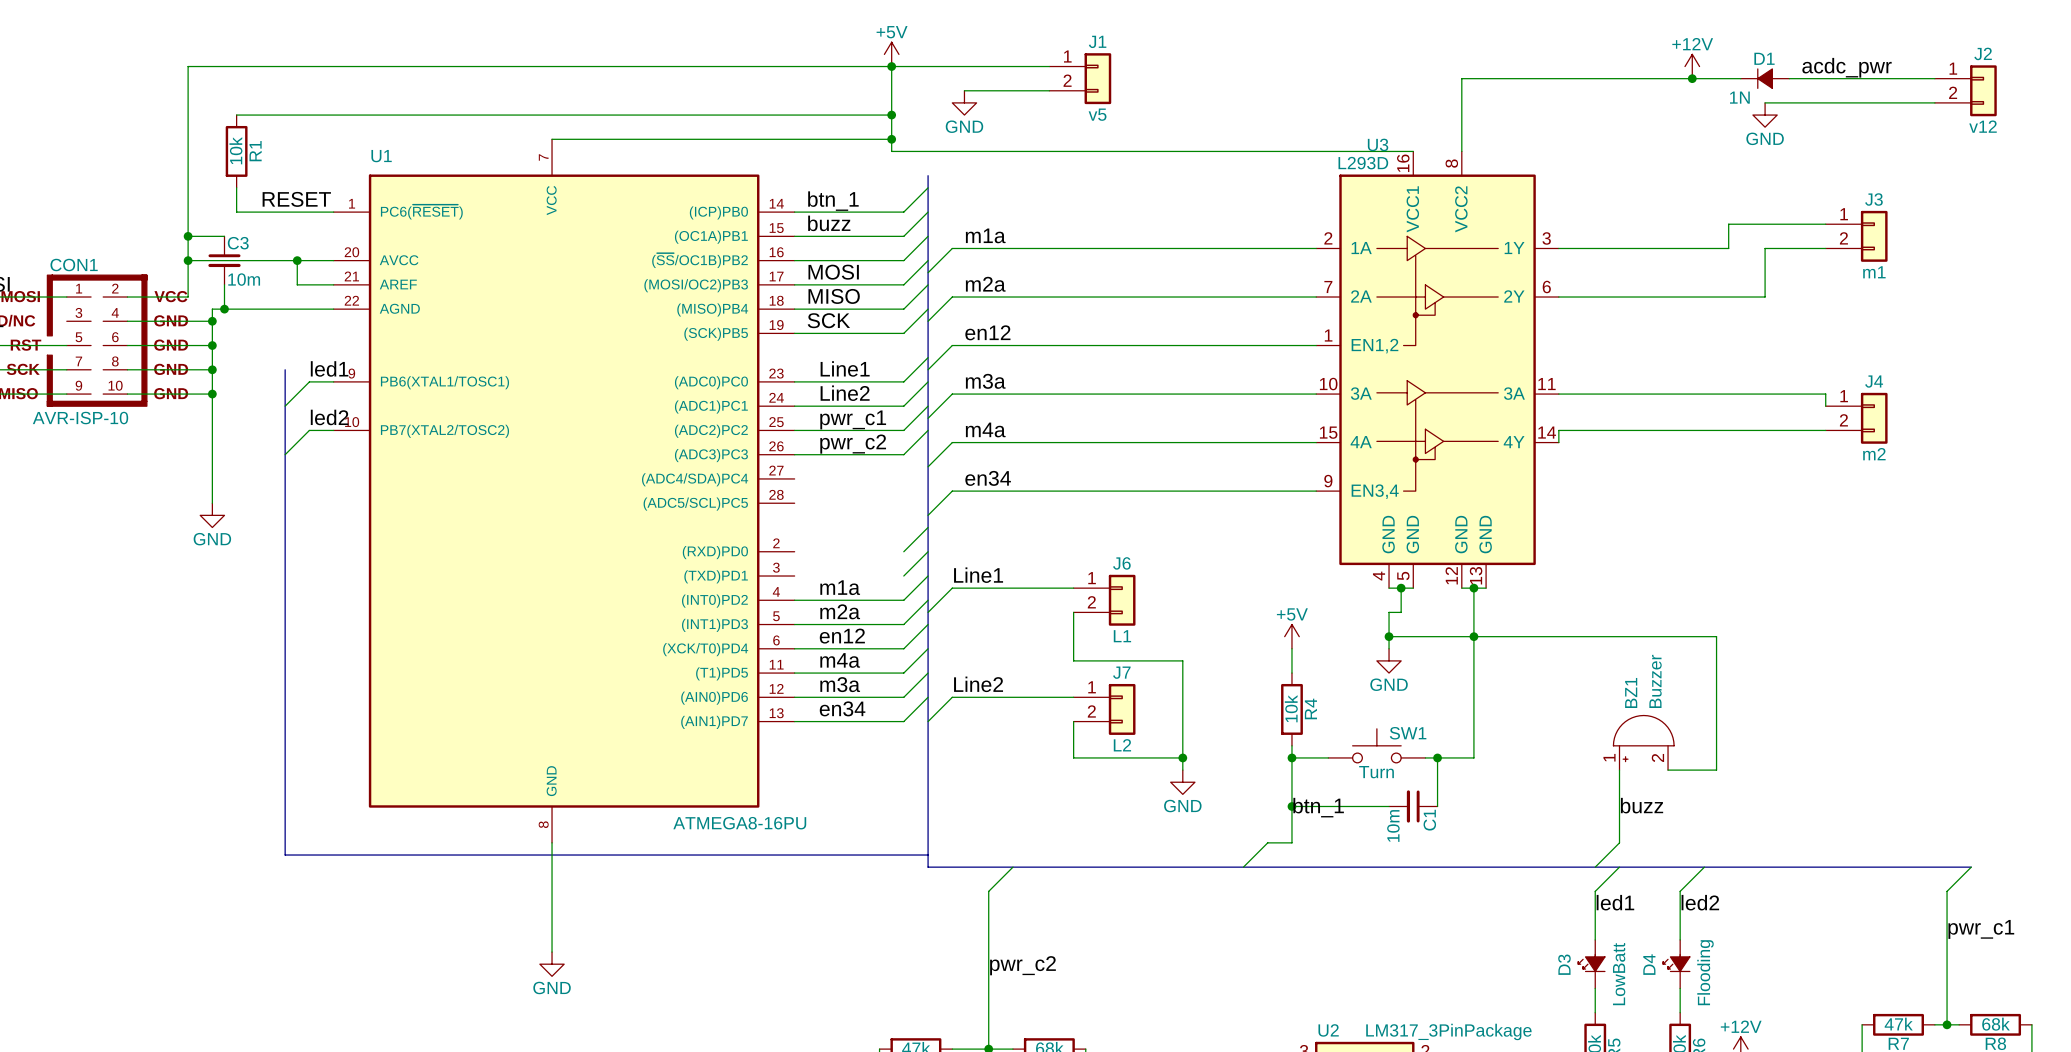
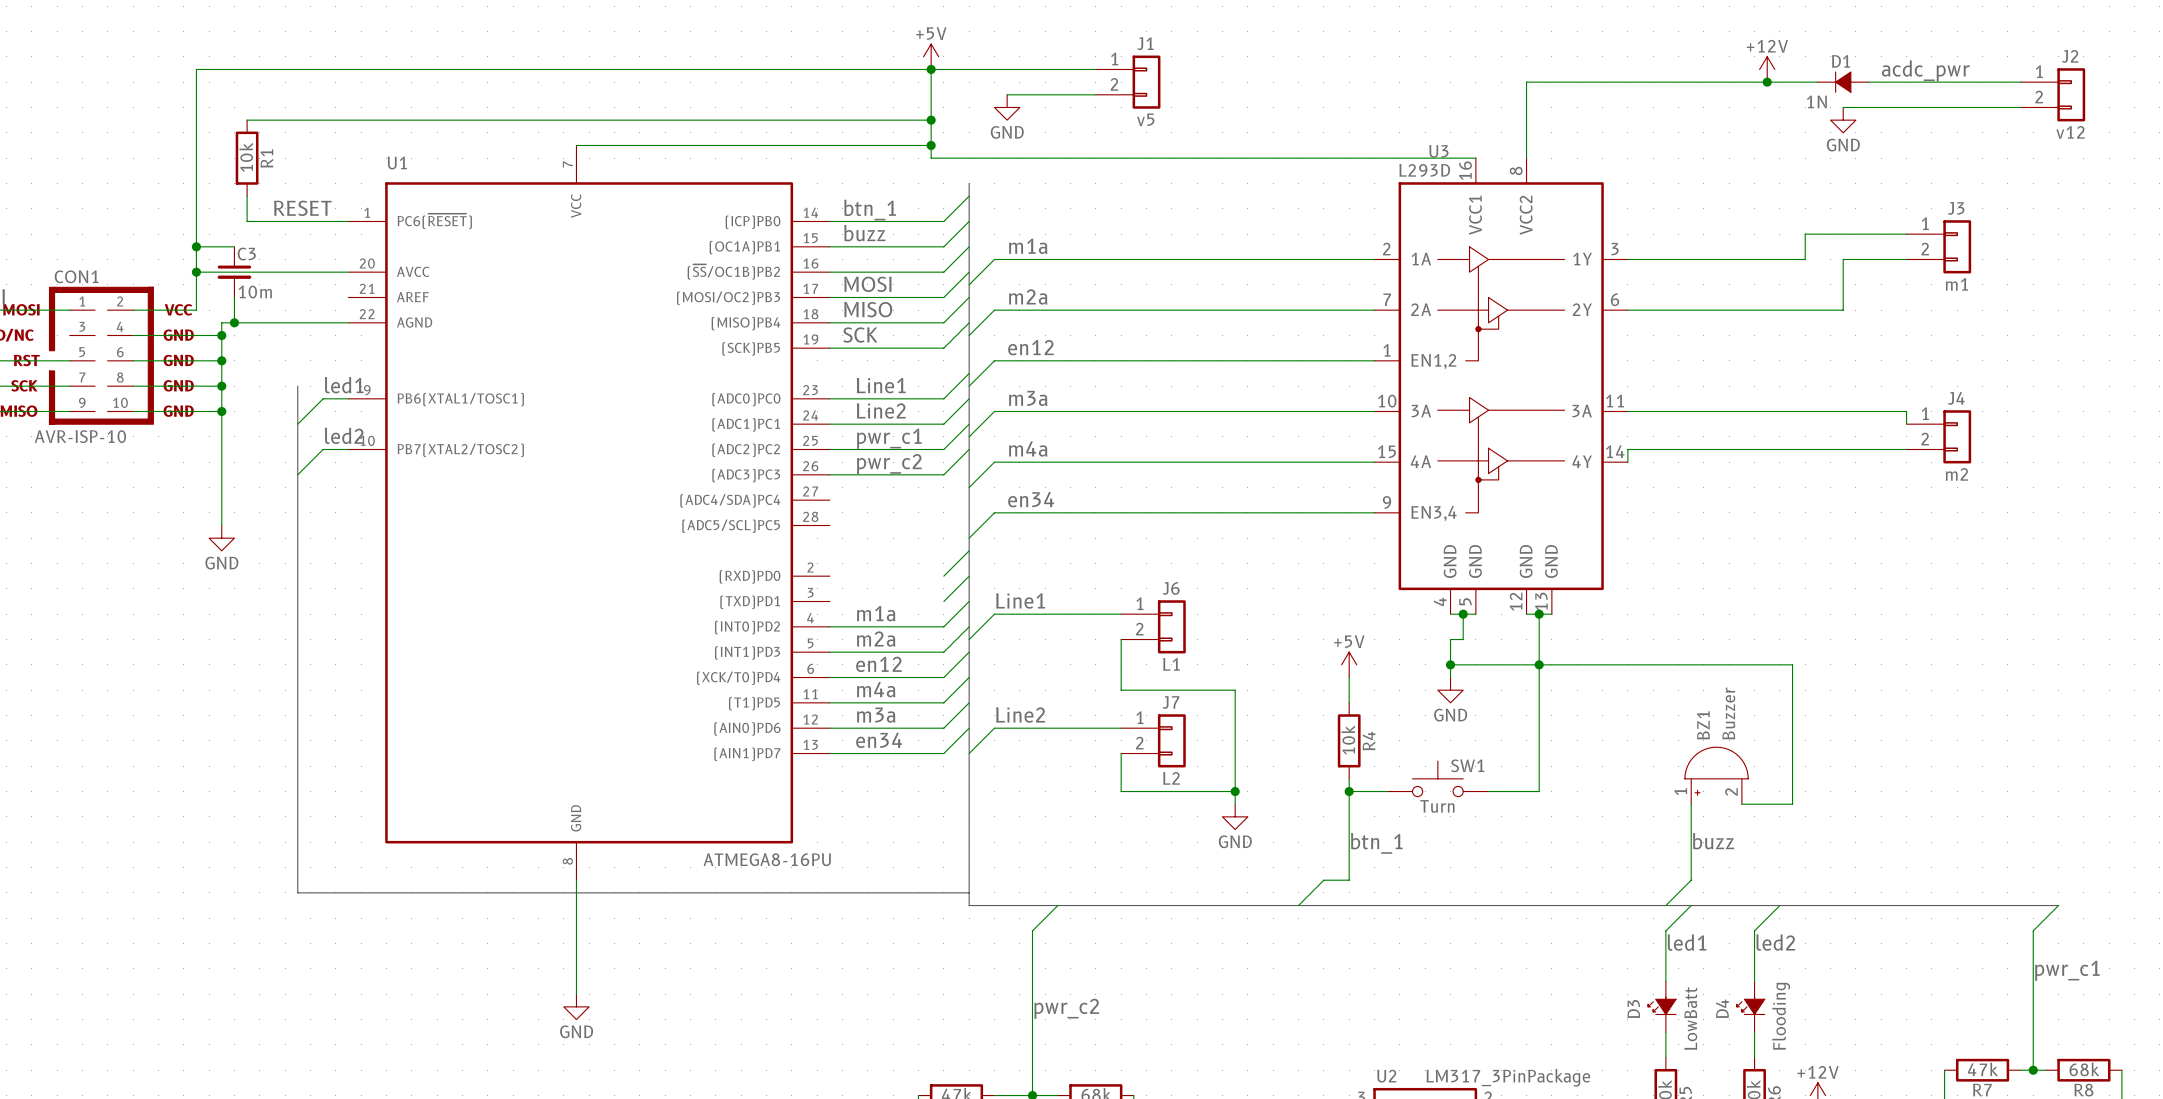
wire: (297, 260) (297, 284) (333, 284) -> none
junction: (297, 260) -> none
wire: (1437, 757) (1437, 806) -> none
junction: (1437, 757) -> none
wire: (1291, 806) (1389, 806) -> none
junction: (1291, 806) -> none
C1: 10m (1413, 806) -> none

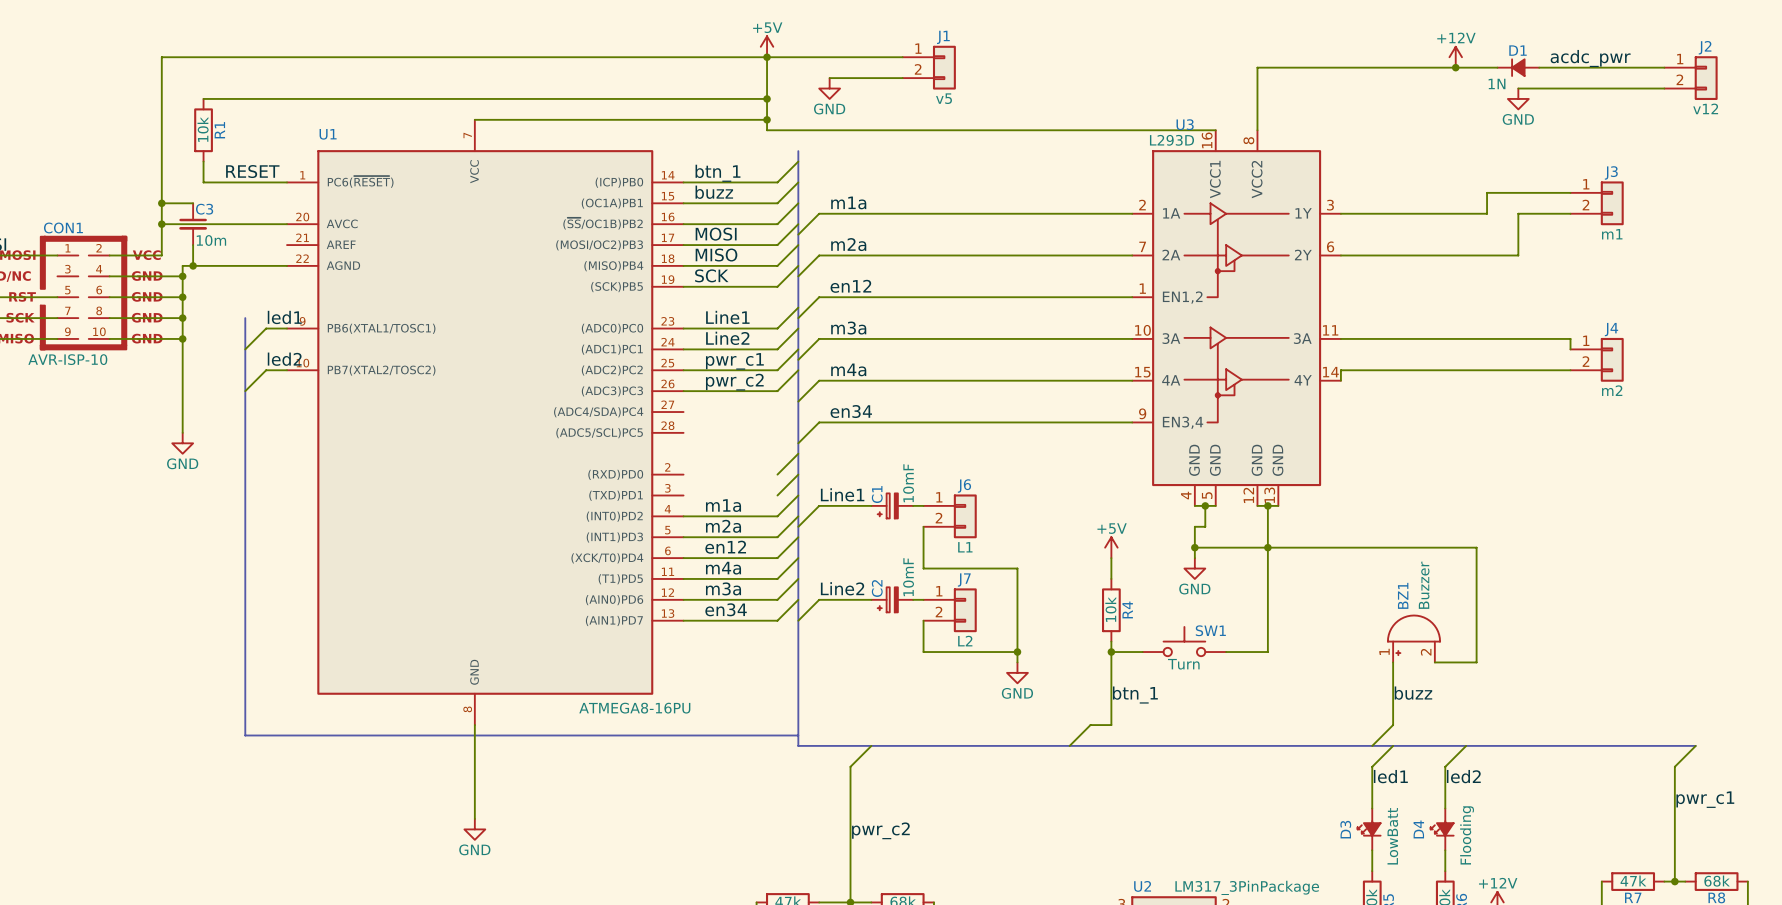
C1: none -> 10mF (892, 505)
C2: none -> 10mF (892, 599)

